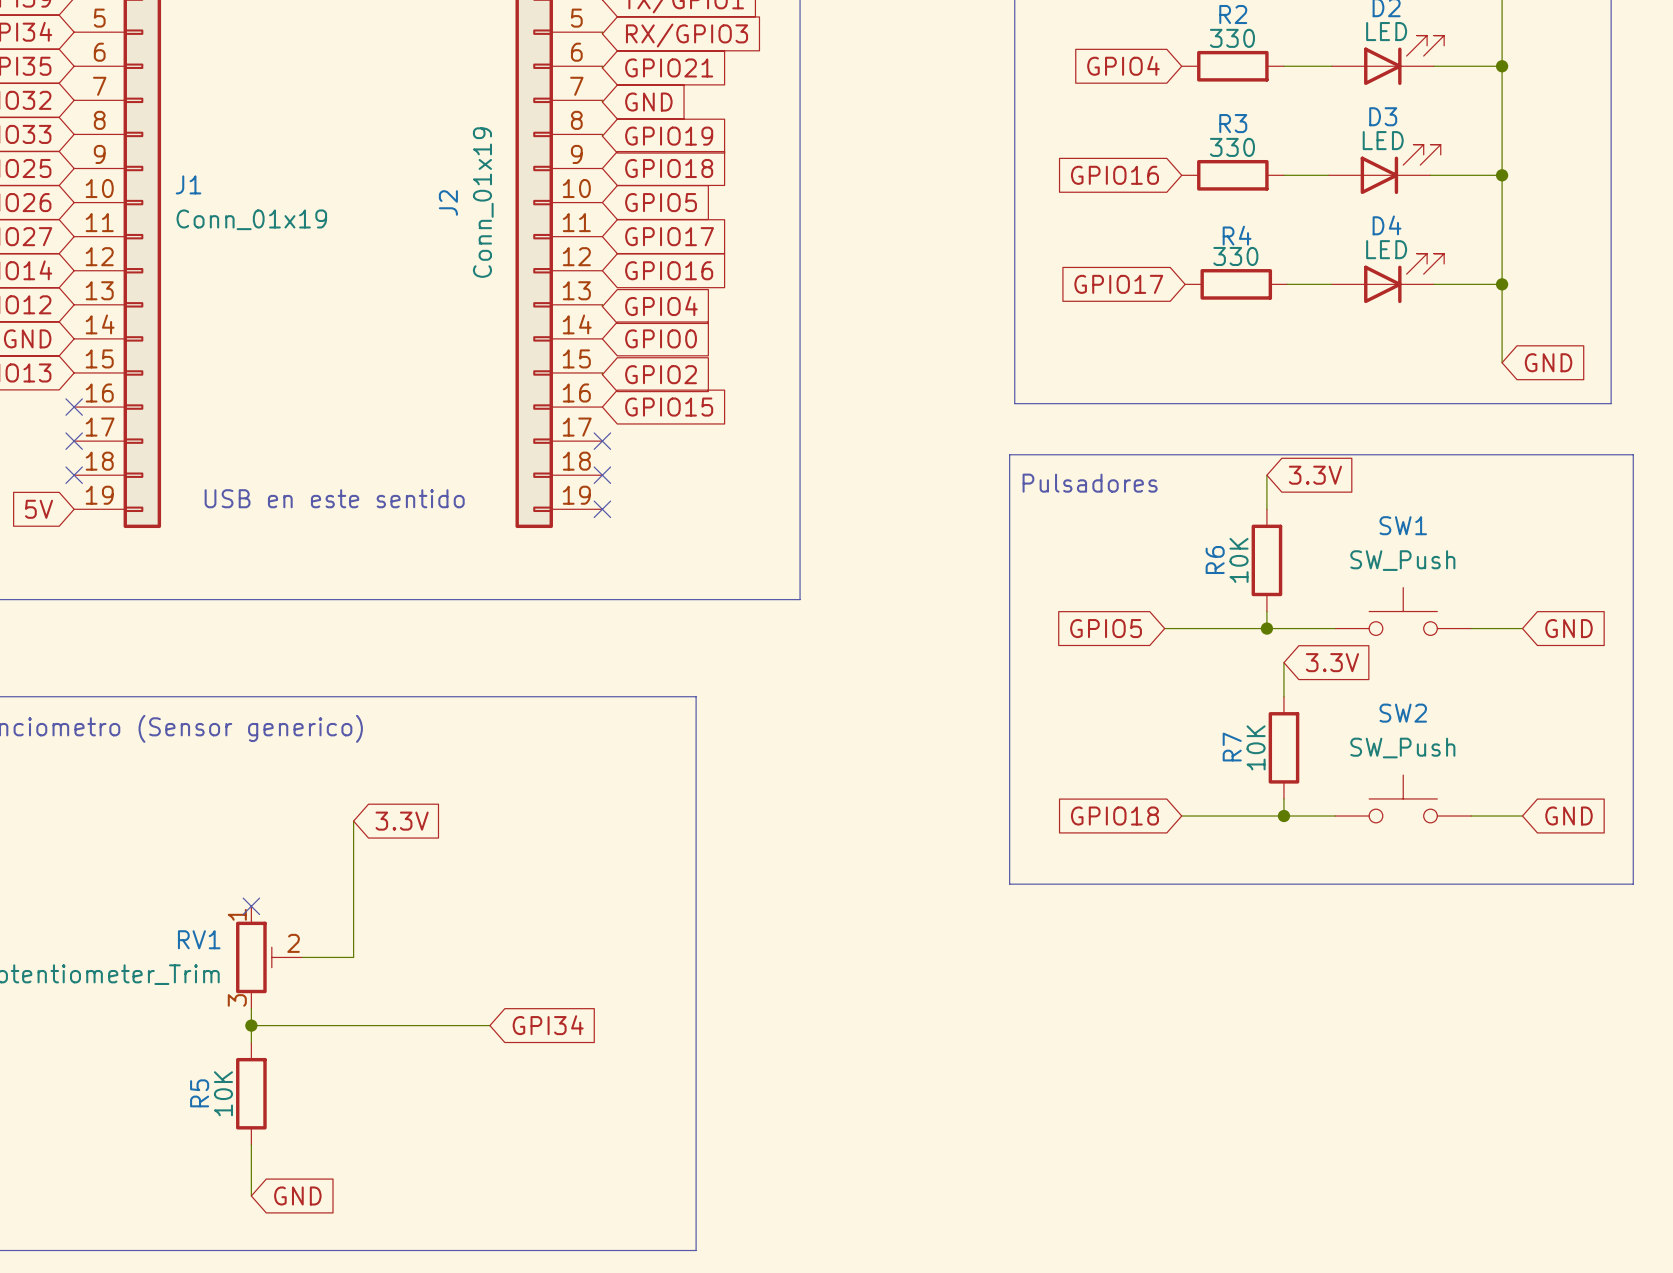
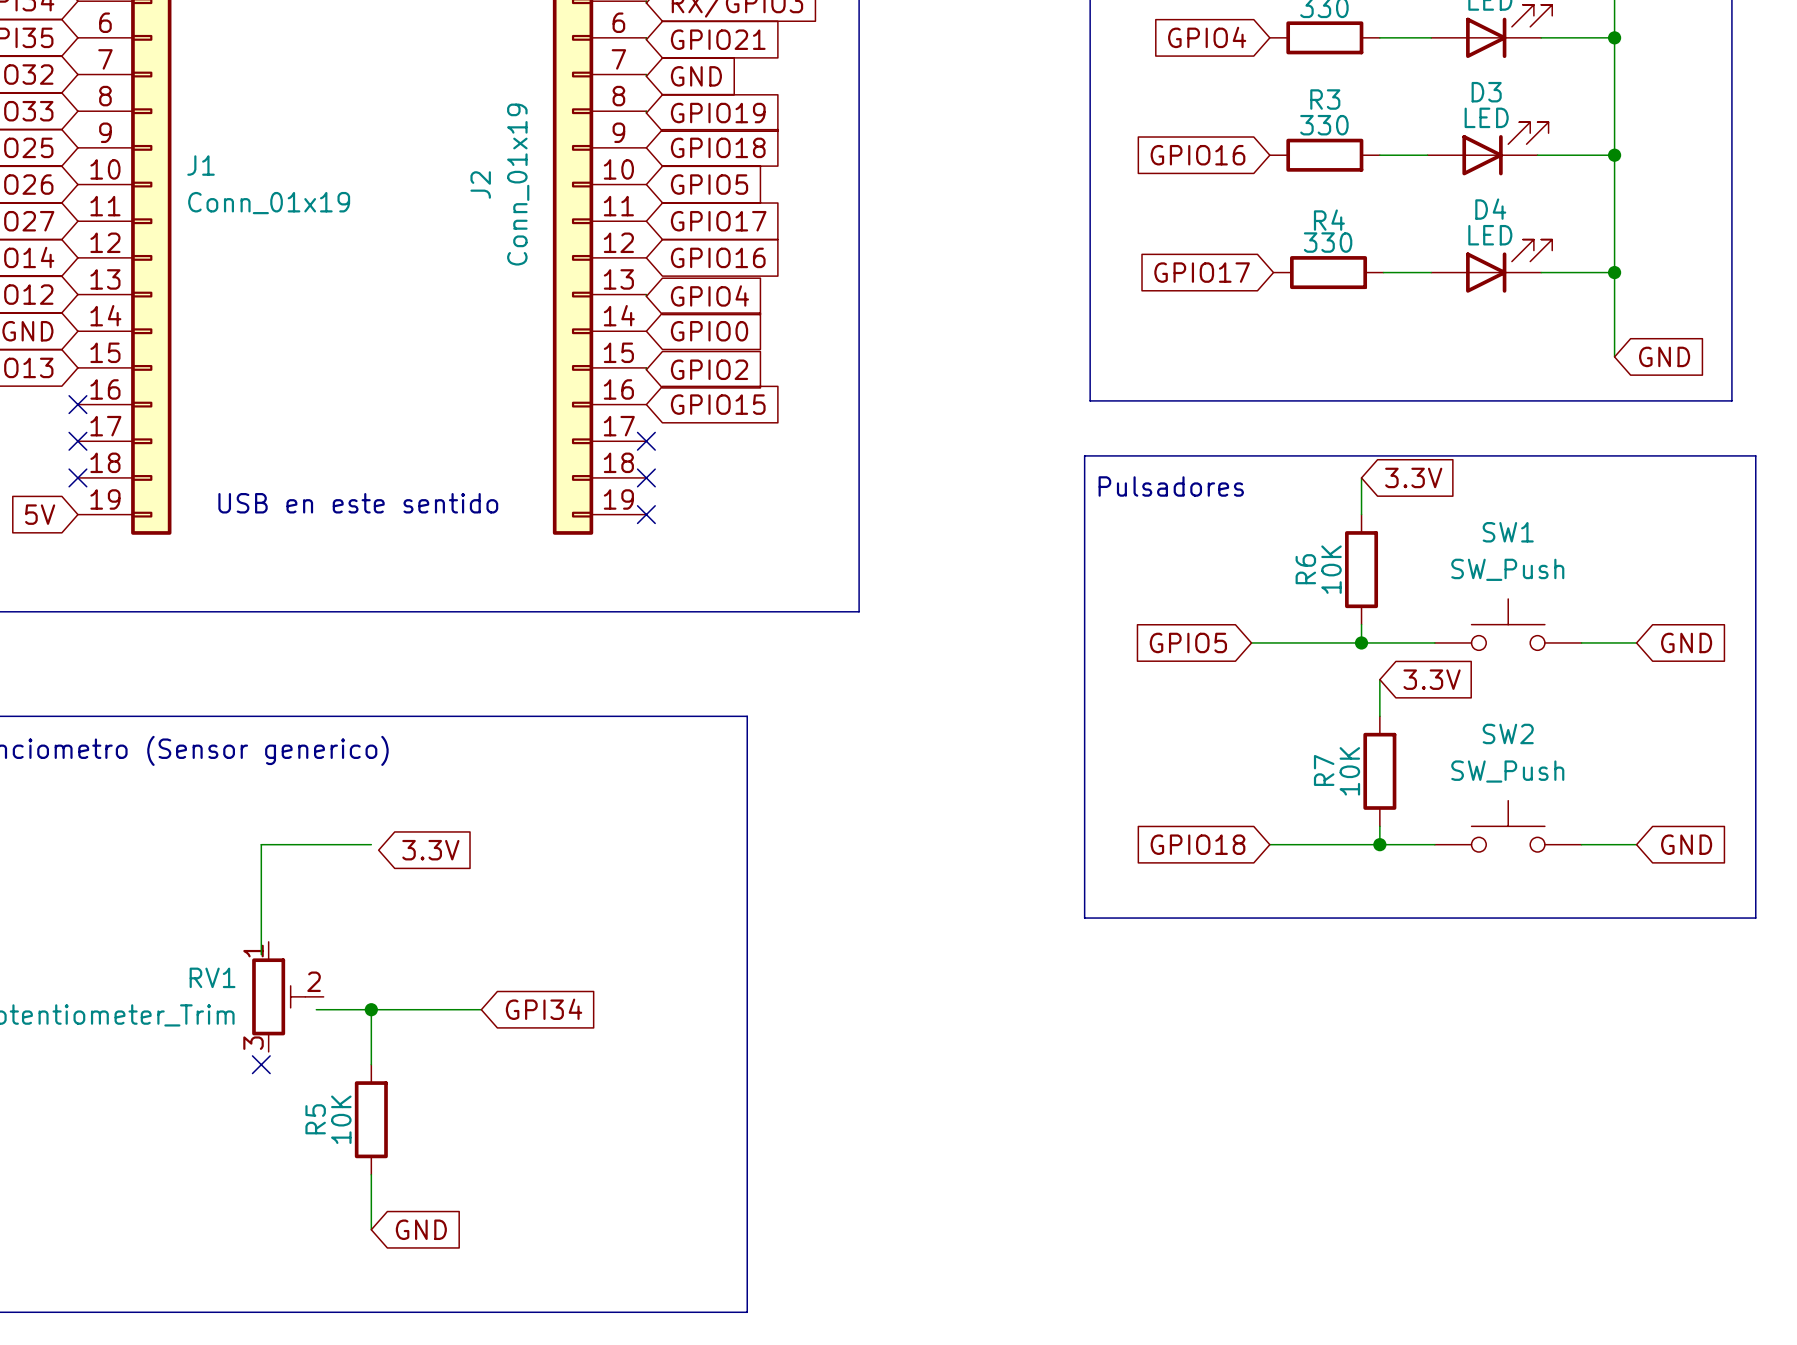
wire: none -> (371, 844) (261, 844) (261, 954)
wire: (353, 821) (353, 957) (302, 957) -> none
no-connect mark: (251, 906) -> none
wire: none -> (316, 1009) (481, 1009)
wire: none -> (371, 1009) (371, 1064)
junction: none -> (371, 1009)
wire: (251, 1008) (251, 1042) -> none
no-connect mark: none -> (261, 1064)
wire: (251, 1025) (489, 1025) -> none
junction: (251, 1025) -> none
global label position: GPI34 (548, 1025) -> GPI34 (544, 1009)
R5 position: (251, 1093) -> (371, 1119)
wire: (251, 1144) (251, 1195) -> (371, 1174) (371, 1229)
global label position: GND (297, 1195) -> GND (421, 1229)

